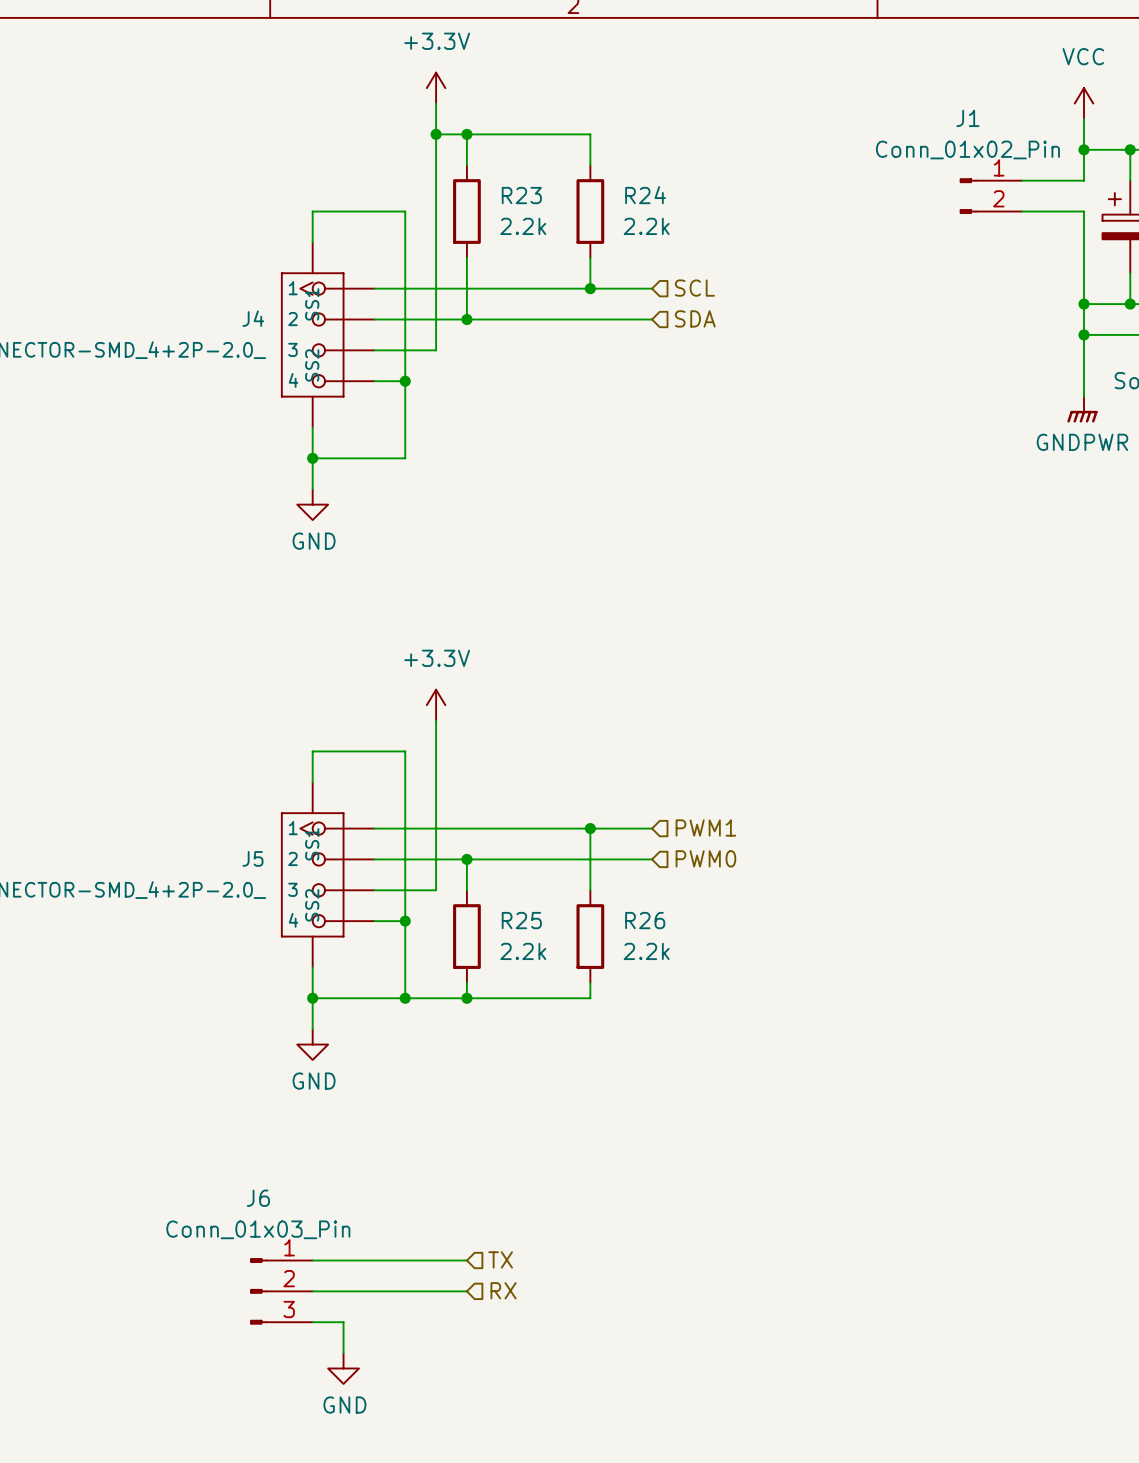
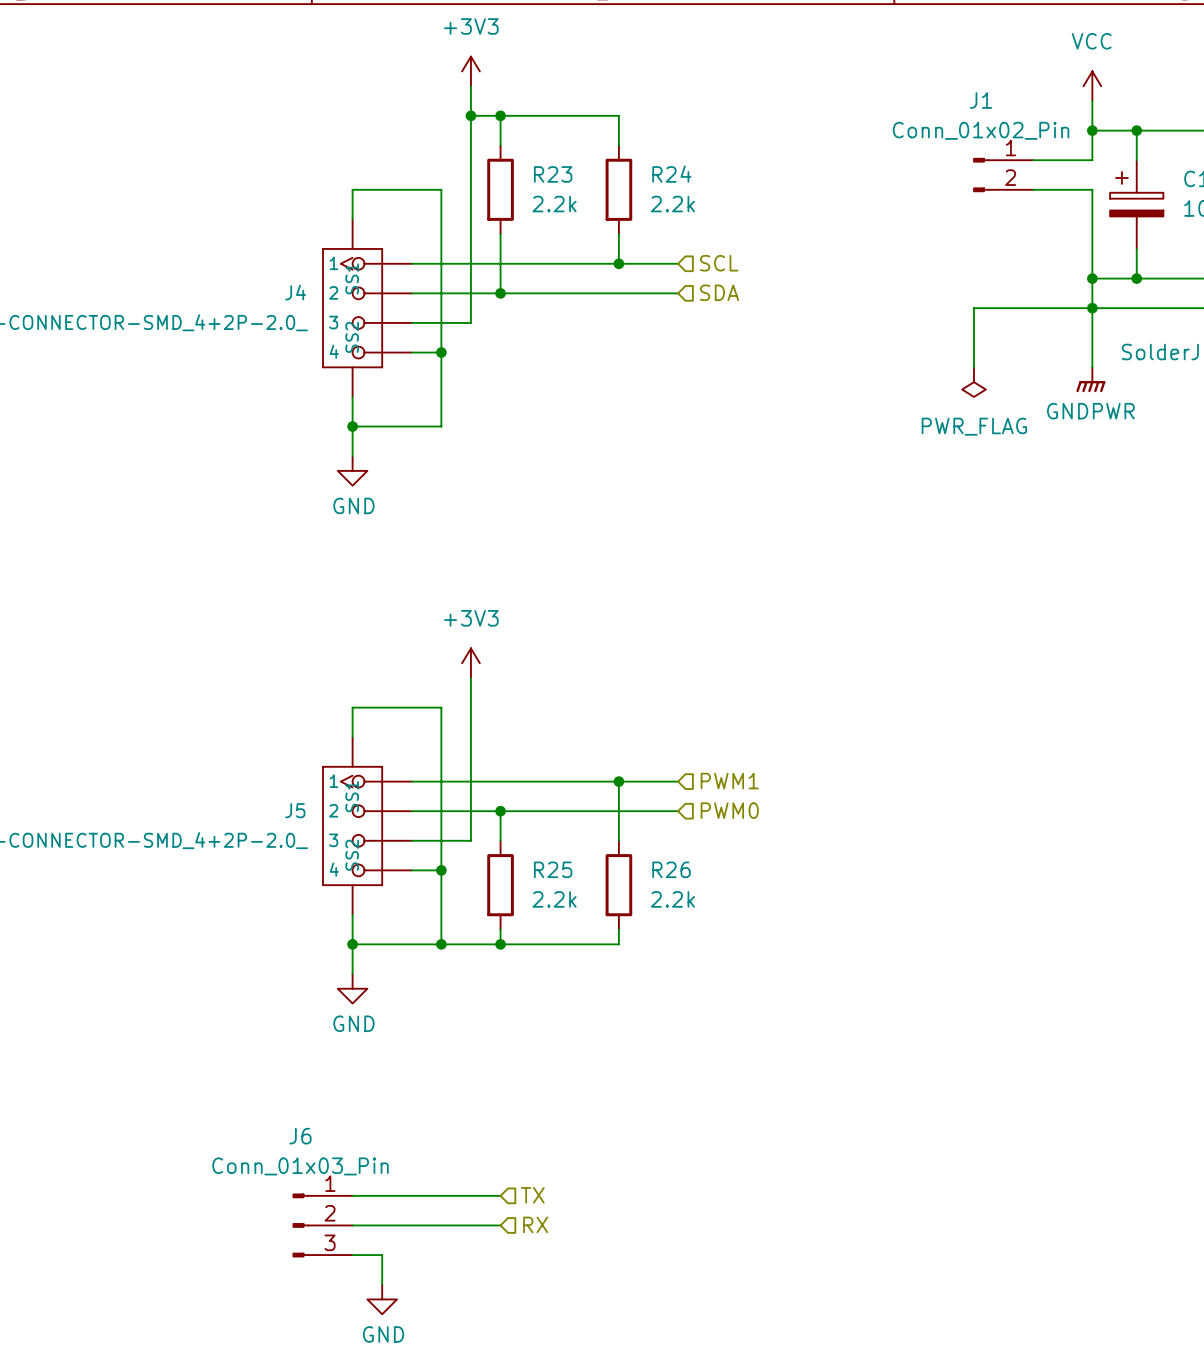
power symbol: +3.3V (436, 88) -> +3V3 (470, 71)
wire: none -> (1092, 308) (974, 308) (974, 367)
power symbol: none -> PWR_FLAG (974, 382)
power symbol: +3.3V (436, 705) -> +3V3 (470, 663)

